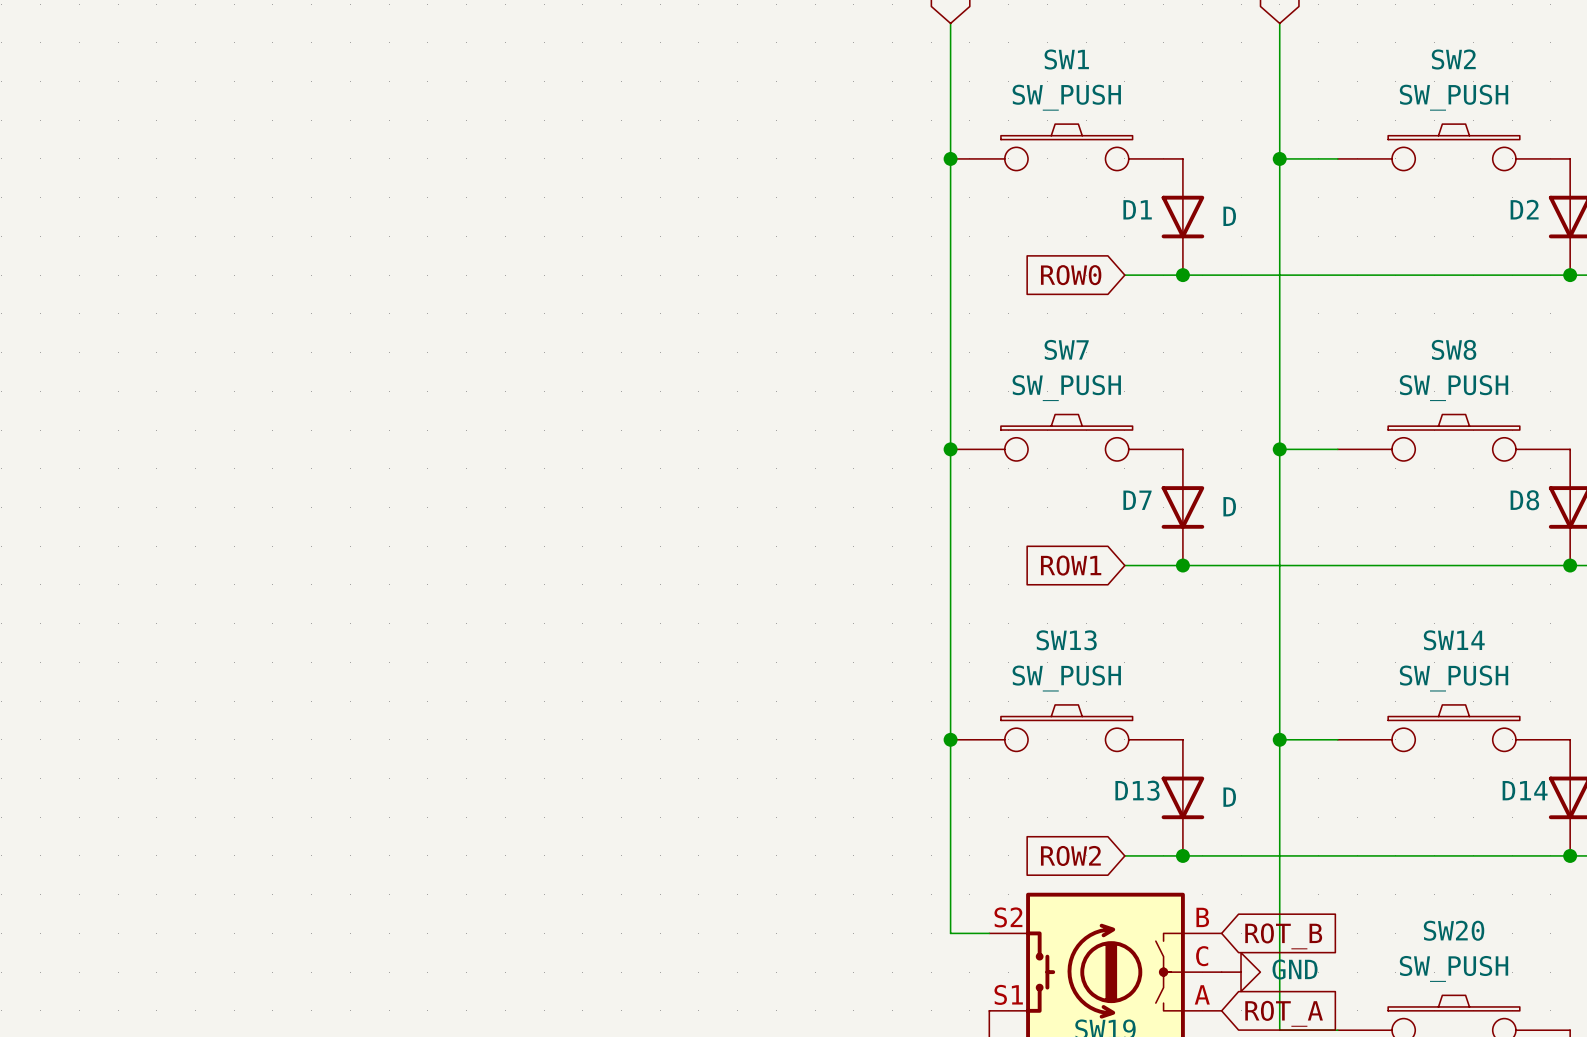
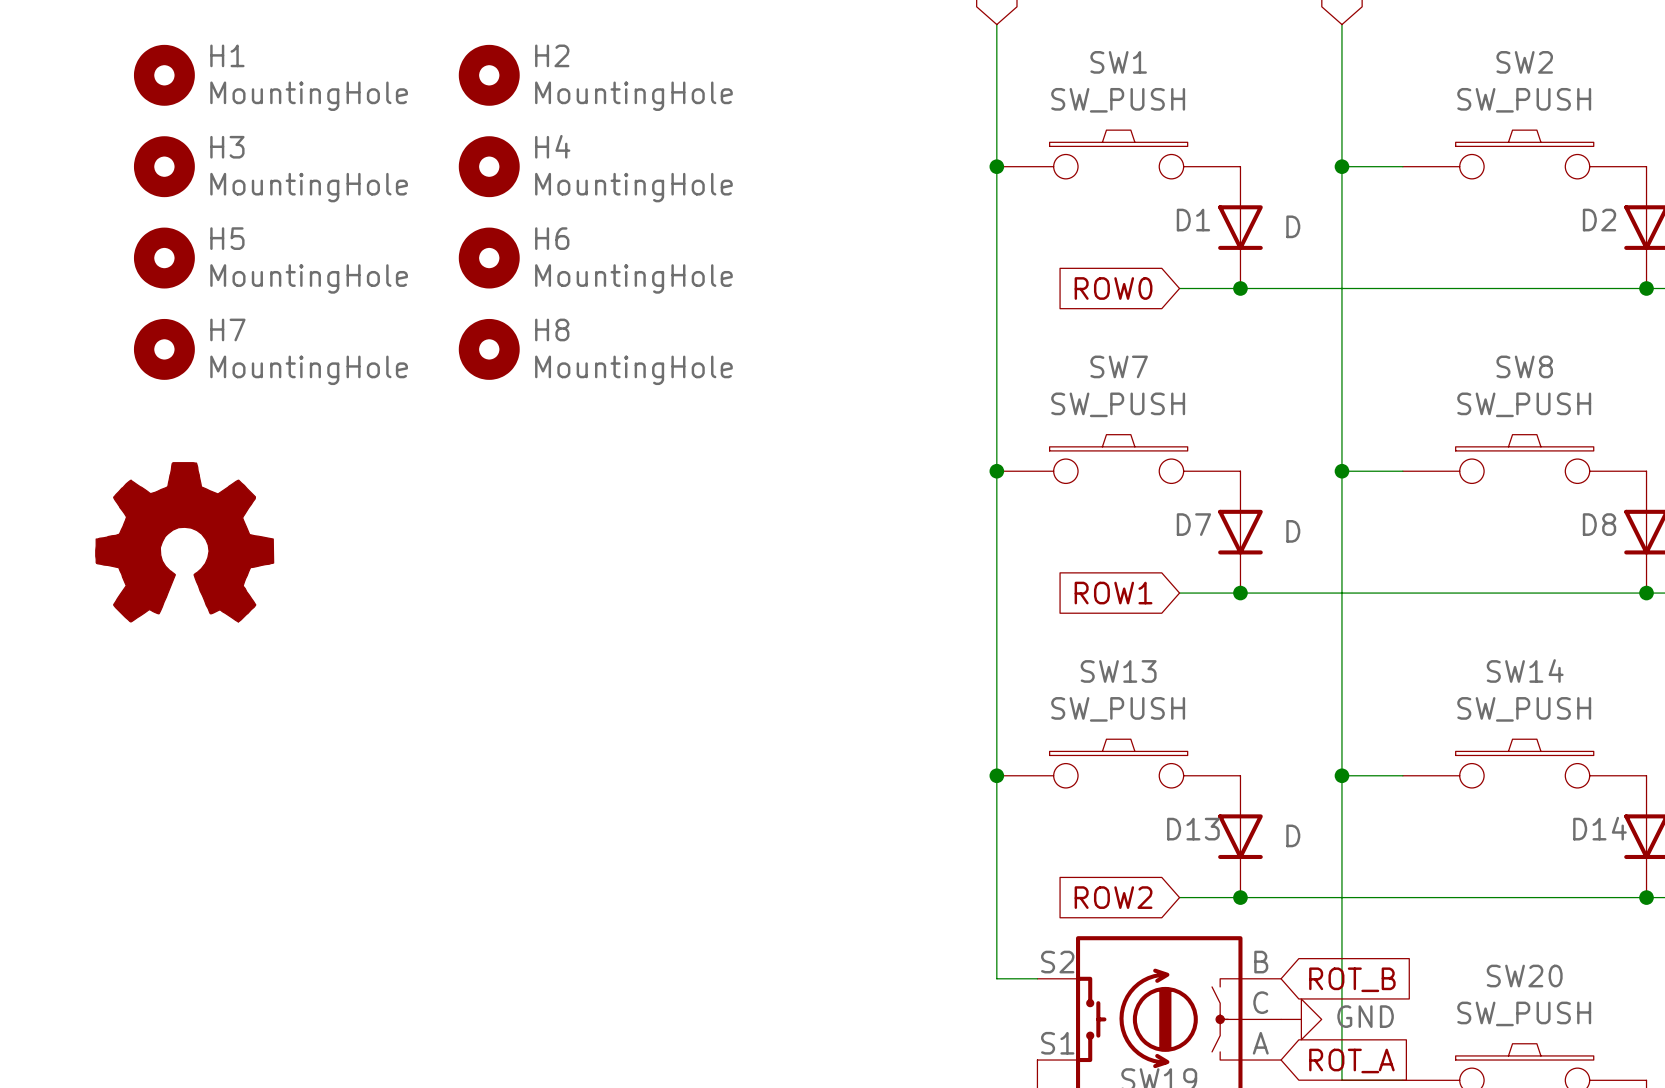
H1: none -> MountingHole (164, 75)
H2: none -> MountingHole (489, 75)
H3: none -> MountingHole (164, 166)
H4: none -> MountingHole (489, 166)
H5: none -> MountingHole (164, 258)
H6: none -> MountingHole (489, 258)
H7: none -> MountingHole (164, 349)
H8: none -> MountingHole (489, 349)
power symbol: none -> (184, 542)

